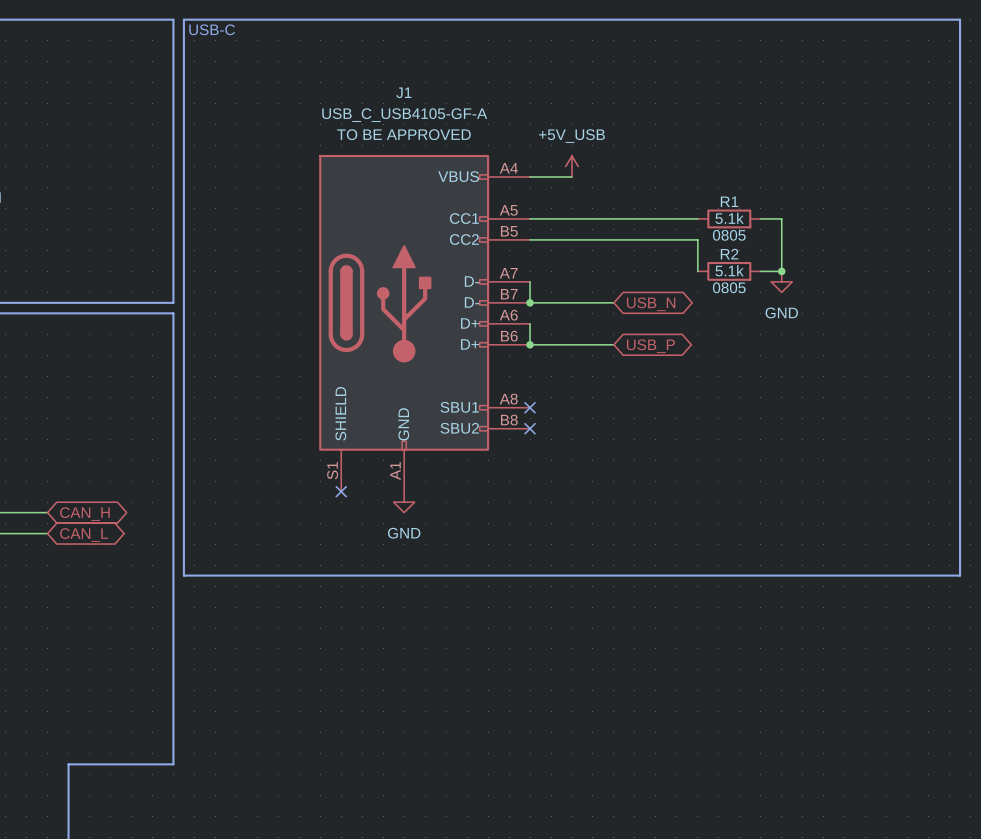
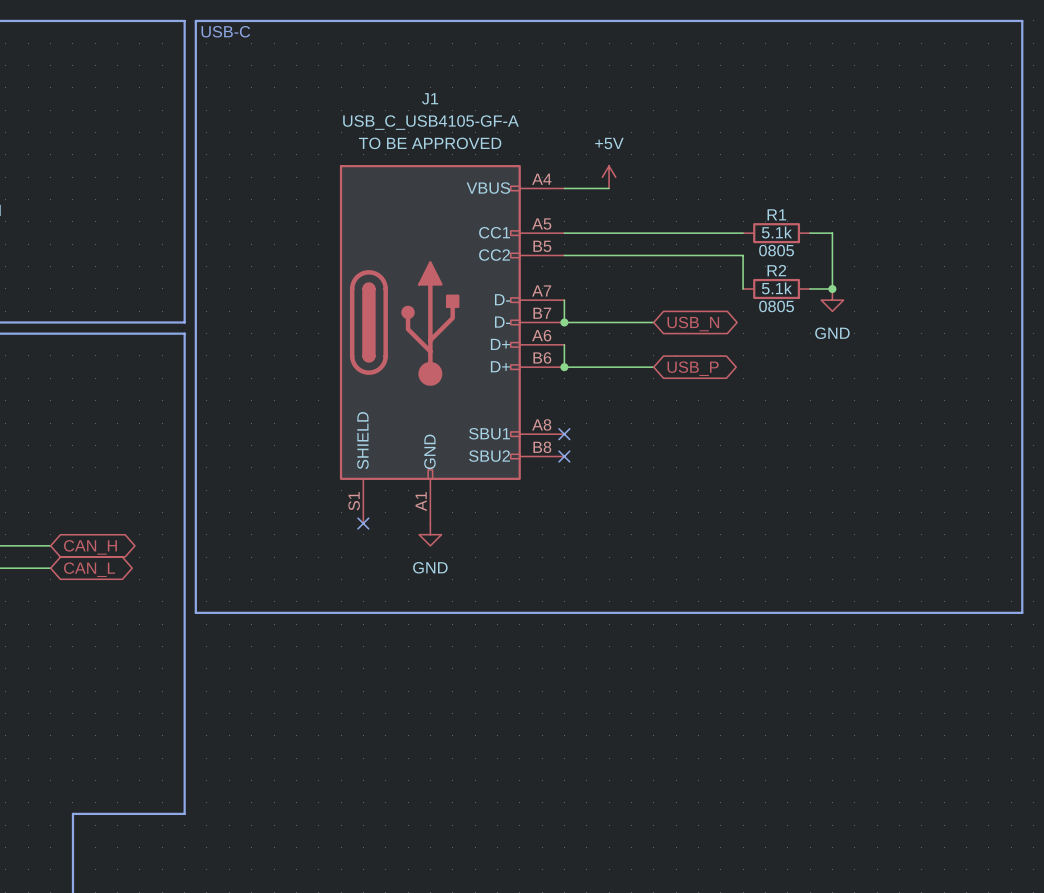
power symbol: +5V_USB (571, 166) -> +5V (609, 177)

